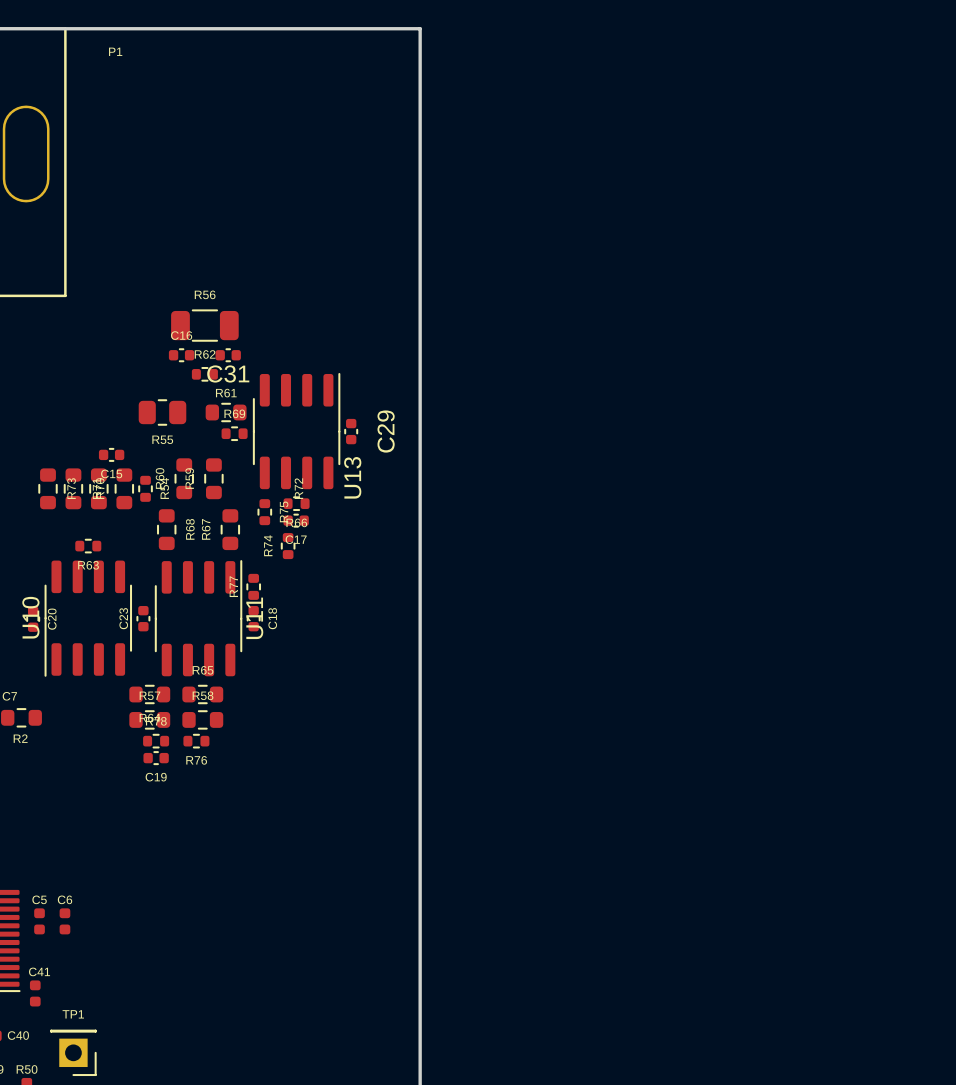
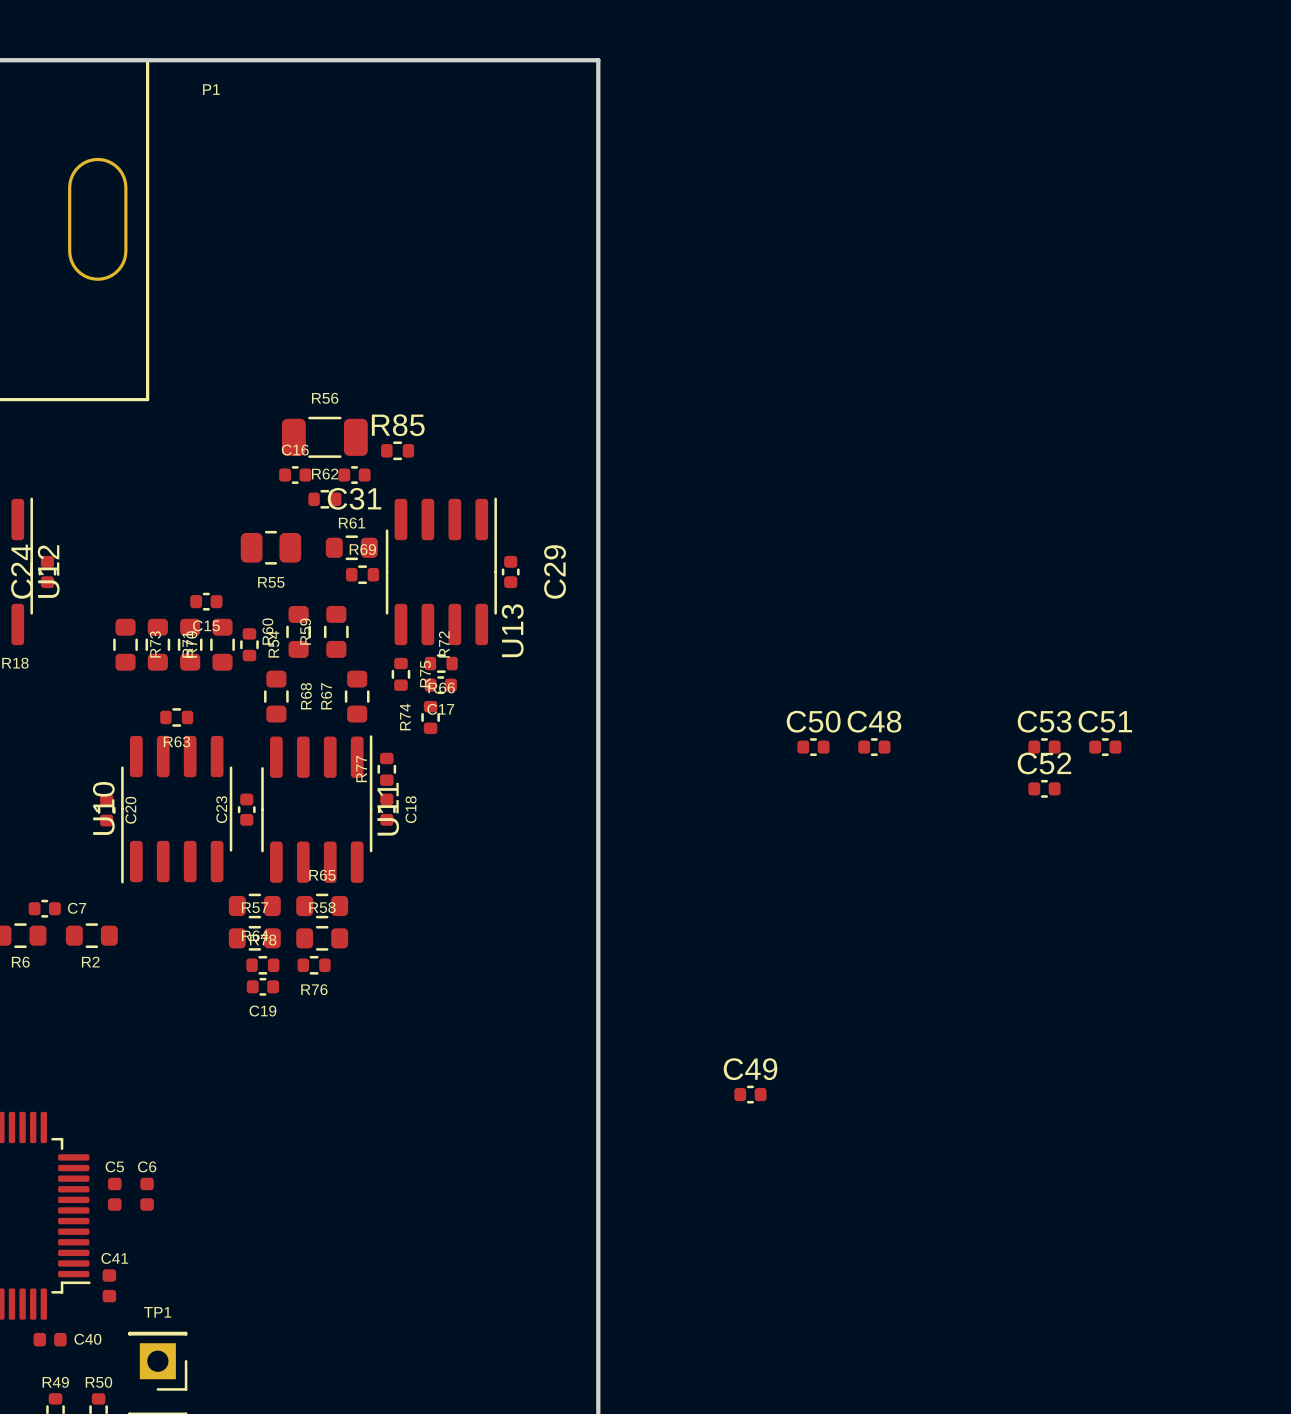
R85: none -> (397, 450)
C50: none -> (813, 747)
C48: none -> (874, 747)
C53: none -> (1044, 747)
C51: none -> (1105, 747)
C52: none -> (1044, 788)
C49: none -> (750, 1094)

